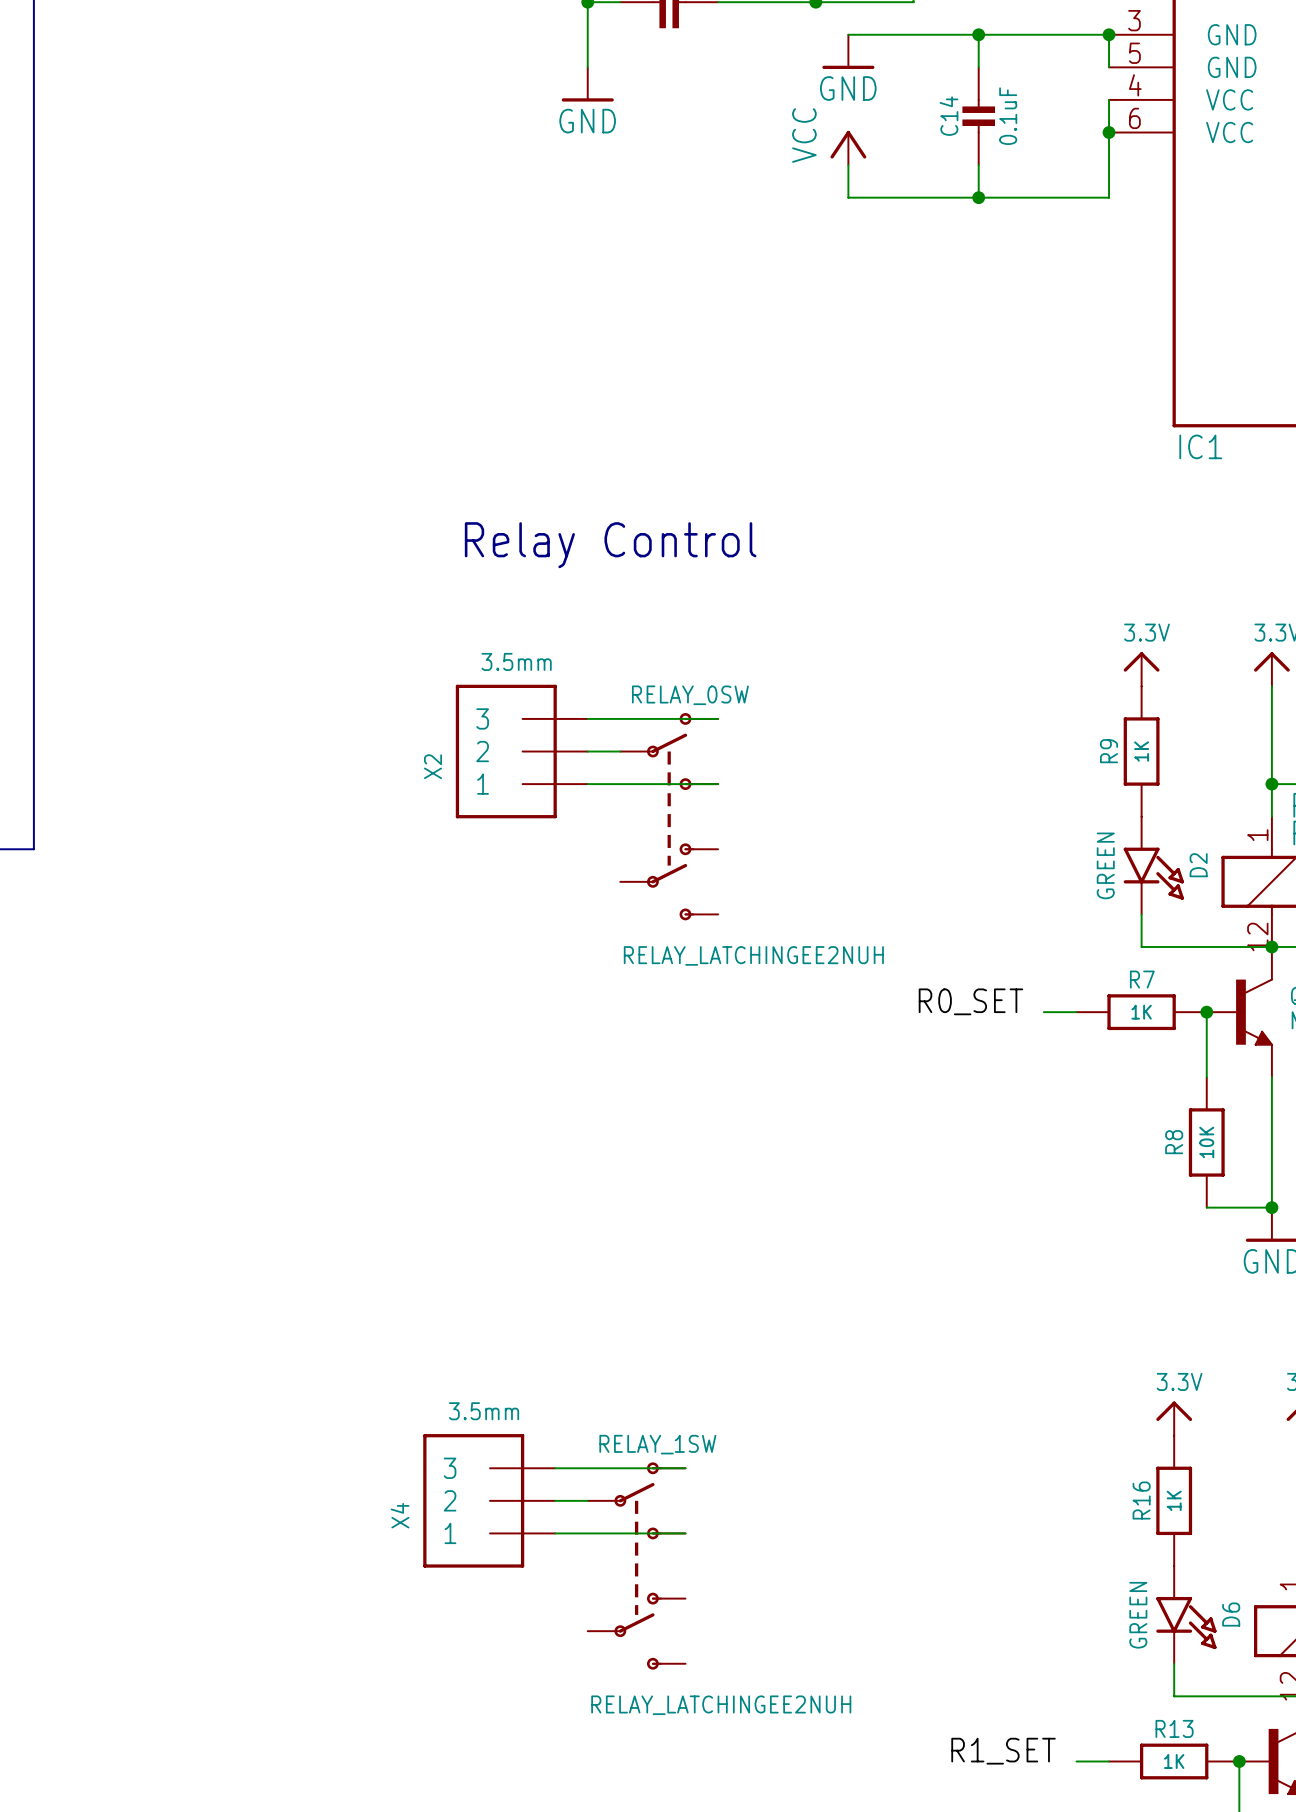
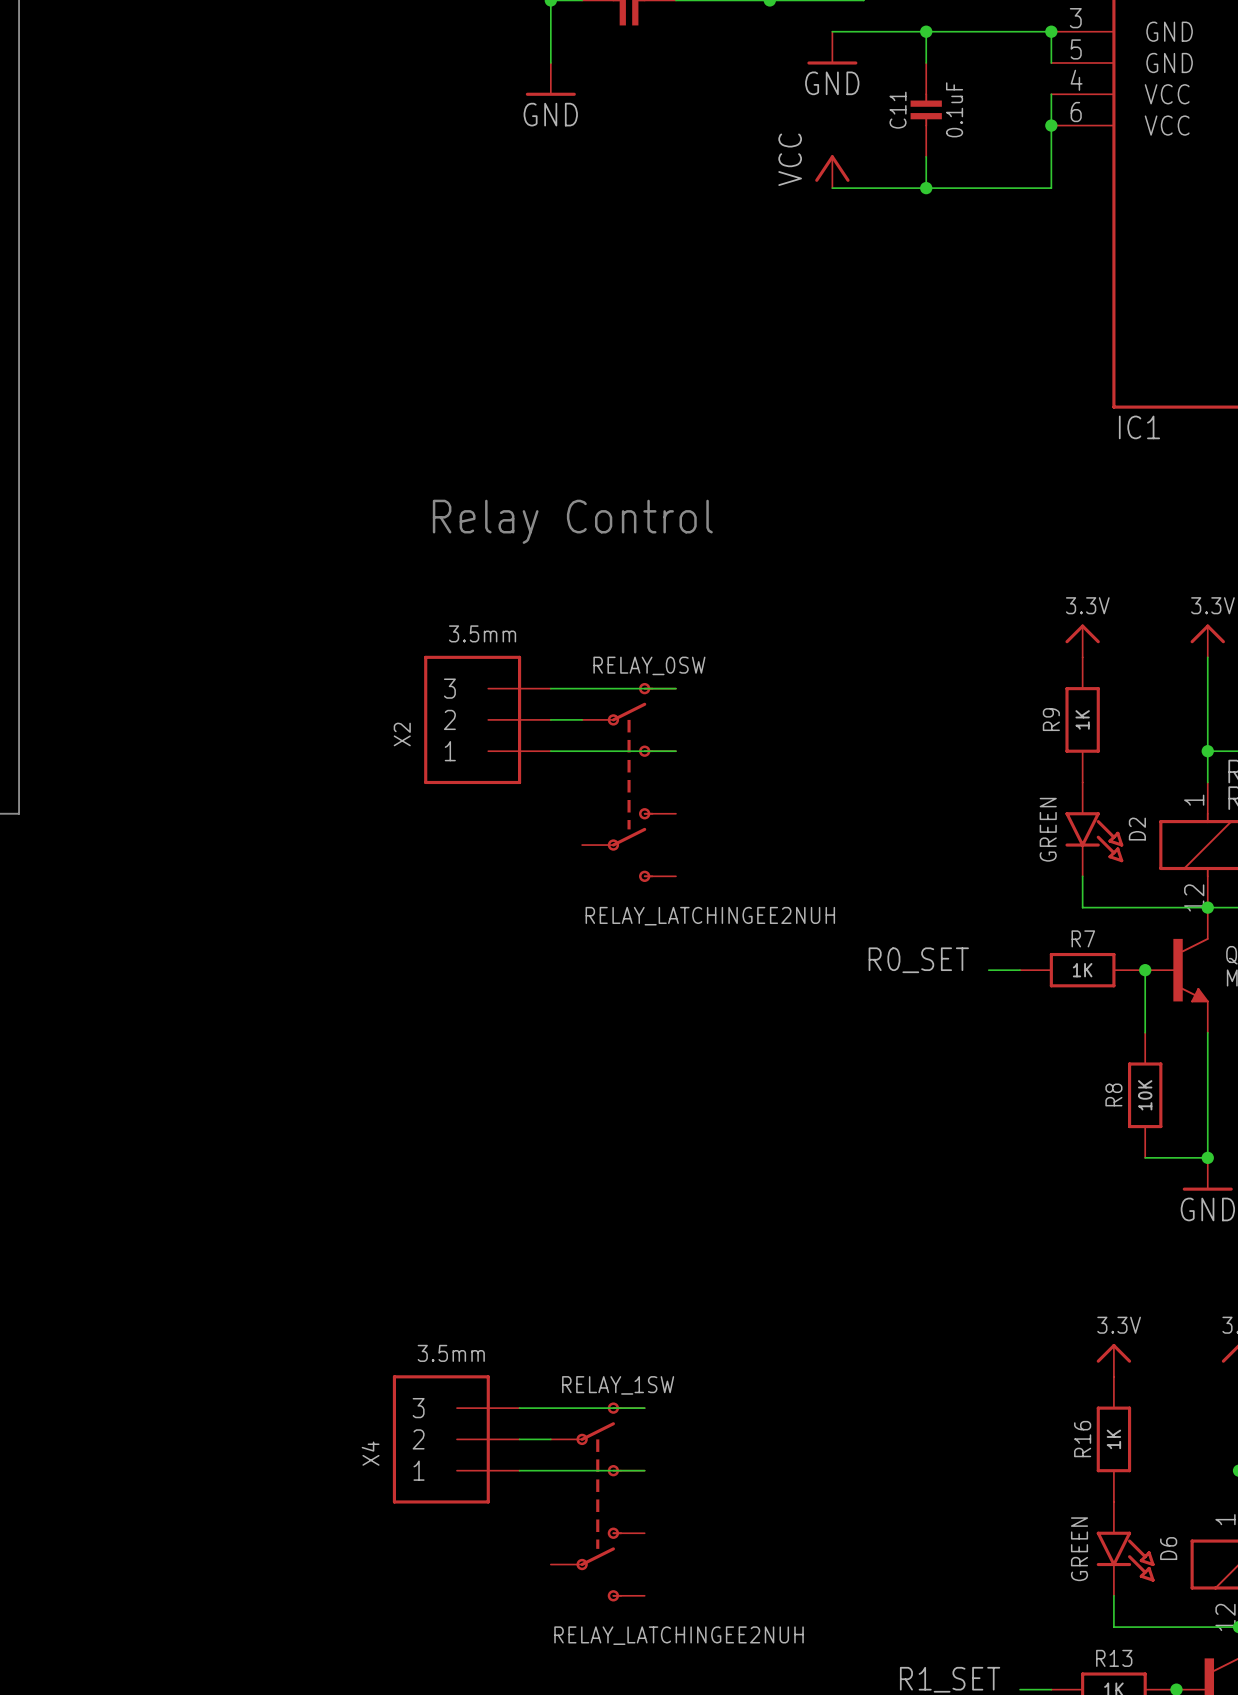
wire: (848, 34) (880, 34) -> none
power symbol position: GND (848, 51) -> GND (832, 48)
C14 name: C14 (948, 116) -> C11 (898, 110)
power symbol position: VCC (848, 147) -> VCC (832, 171)
wire: (848, 165) (848, 197) (880, 197) -> none

